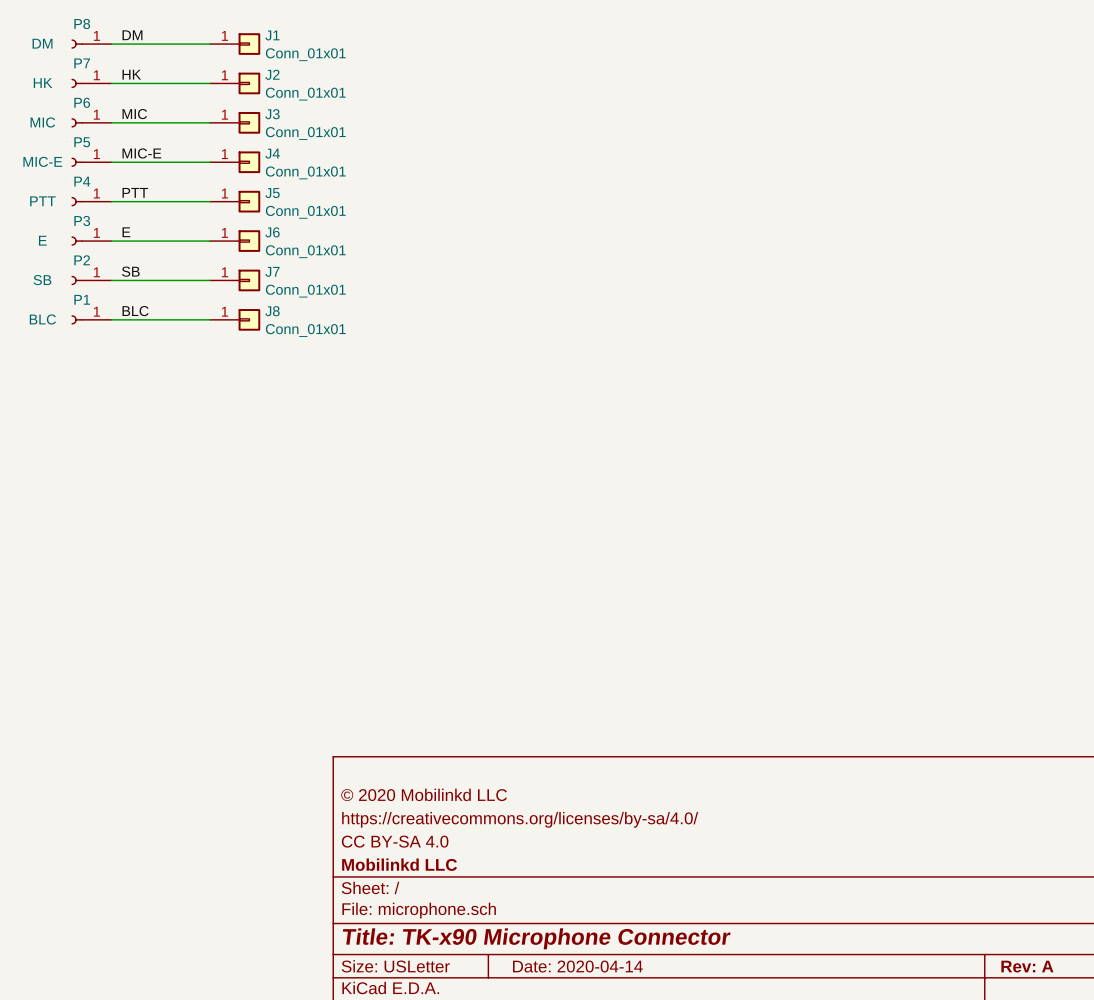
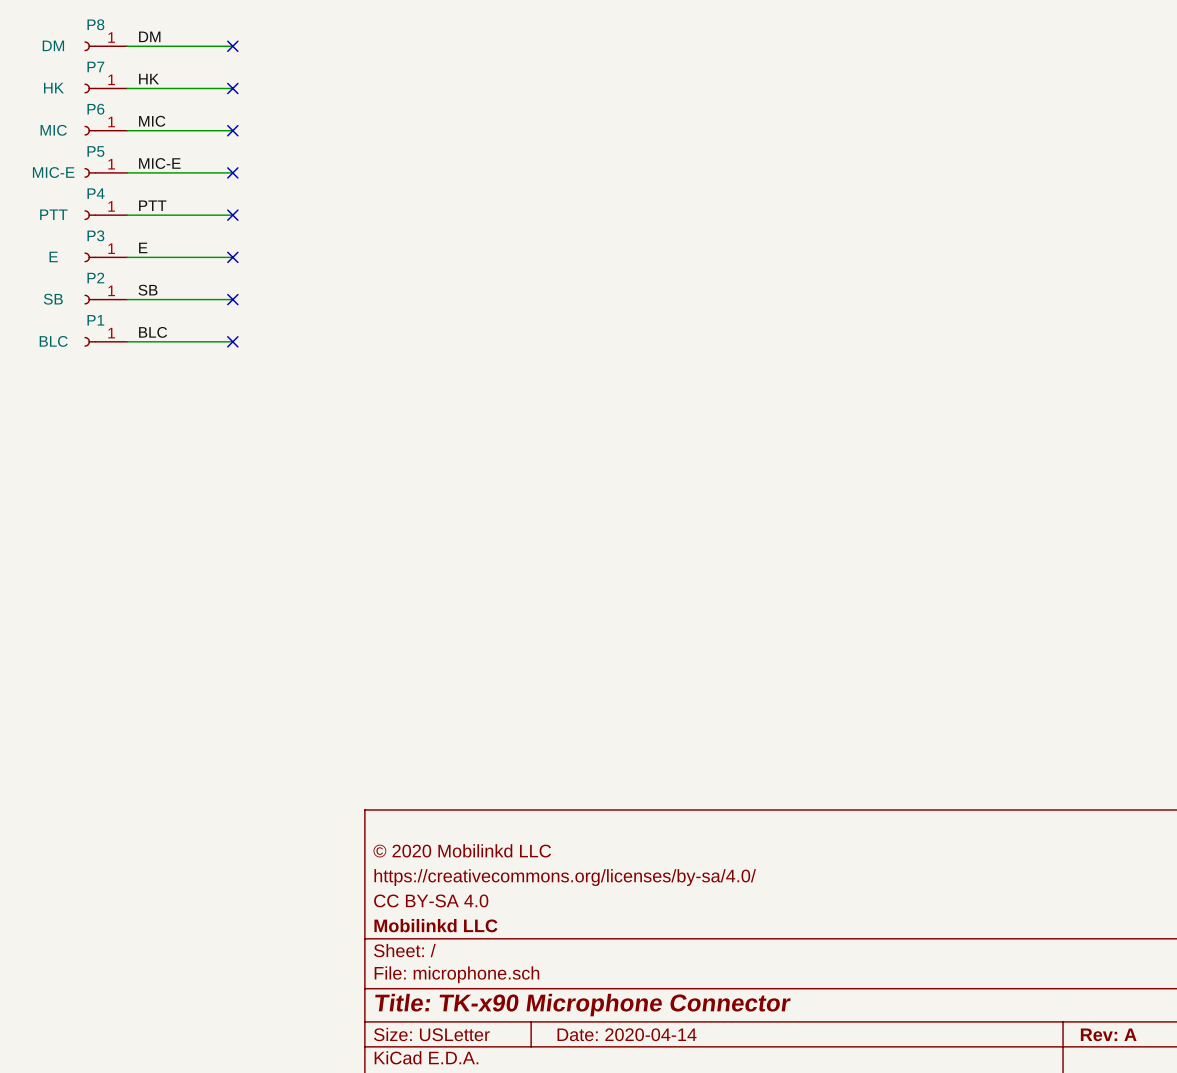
no-connect mark: none -> (232, 46)
J1: Conn_01x01 (235, 44) -> none
no-connect mark: none -> (232, 88)
J2: Conn_01x01 (235, 83) -> none
no-connect mark: none -> (232, 130)
J3: Conn_01x01 (235, 122) -> none
no-connect mark: none -> (232, 172)
J4: Conn_01x01 (235, 162) -> none
no-connect mark: none -> (232, 215)
J5: Conn_01x01 (235, 201) -> none
no-connect mark: none -> (232, 257)
J6: Conn_01x01 (235, 241) -> none
no-connect mark: none -> (232, 299)
J7: Conn_01x01 (235, 280) -> none
no-connect mark: none -> (232, 341)
J8: Conn_01x01 (235, 319) -> none

